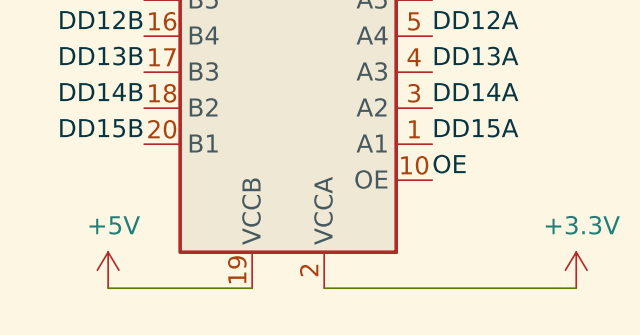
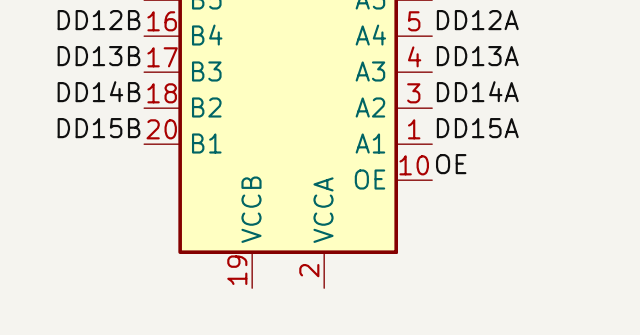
power symbol: +5V (108, 270) -> none
power symbol: +3.3V (576, 270) -> none
wire: (108, 288) (252, 288) -> none
wire: (324, 288) (576, 288) -> none

